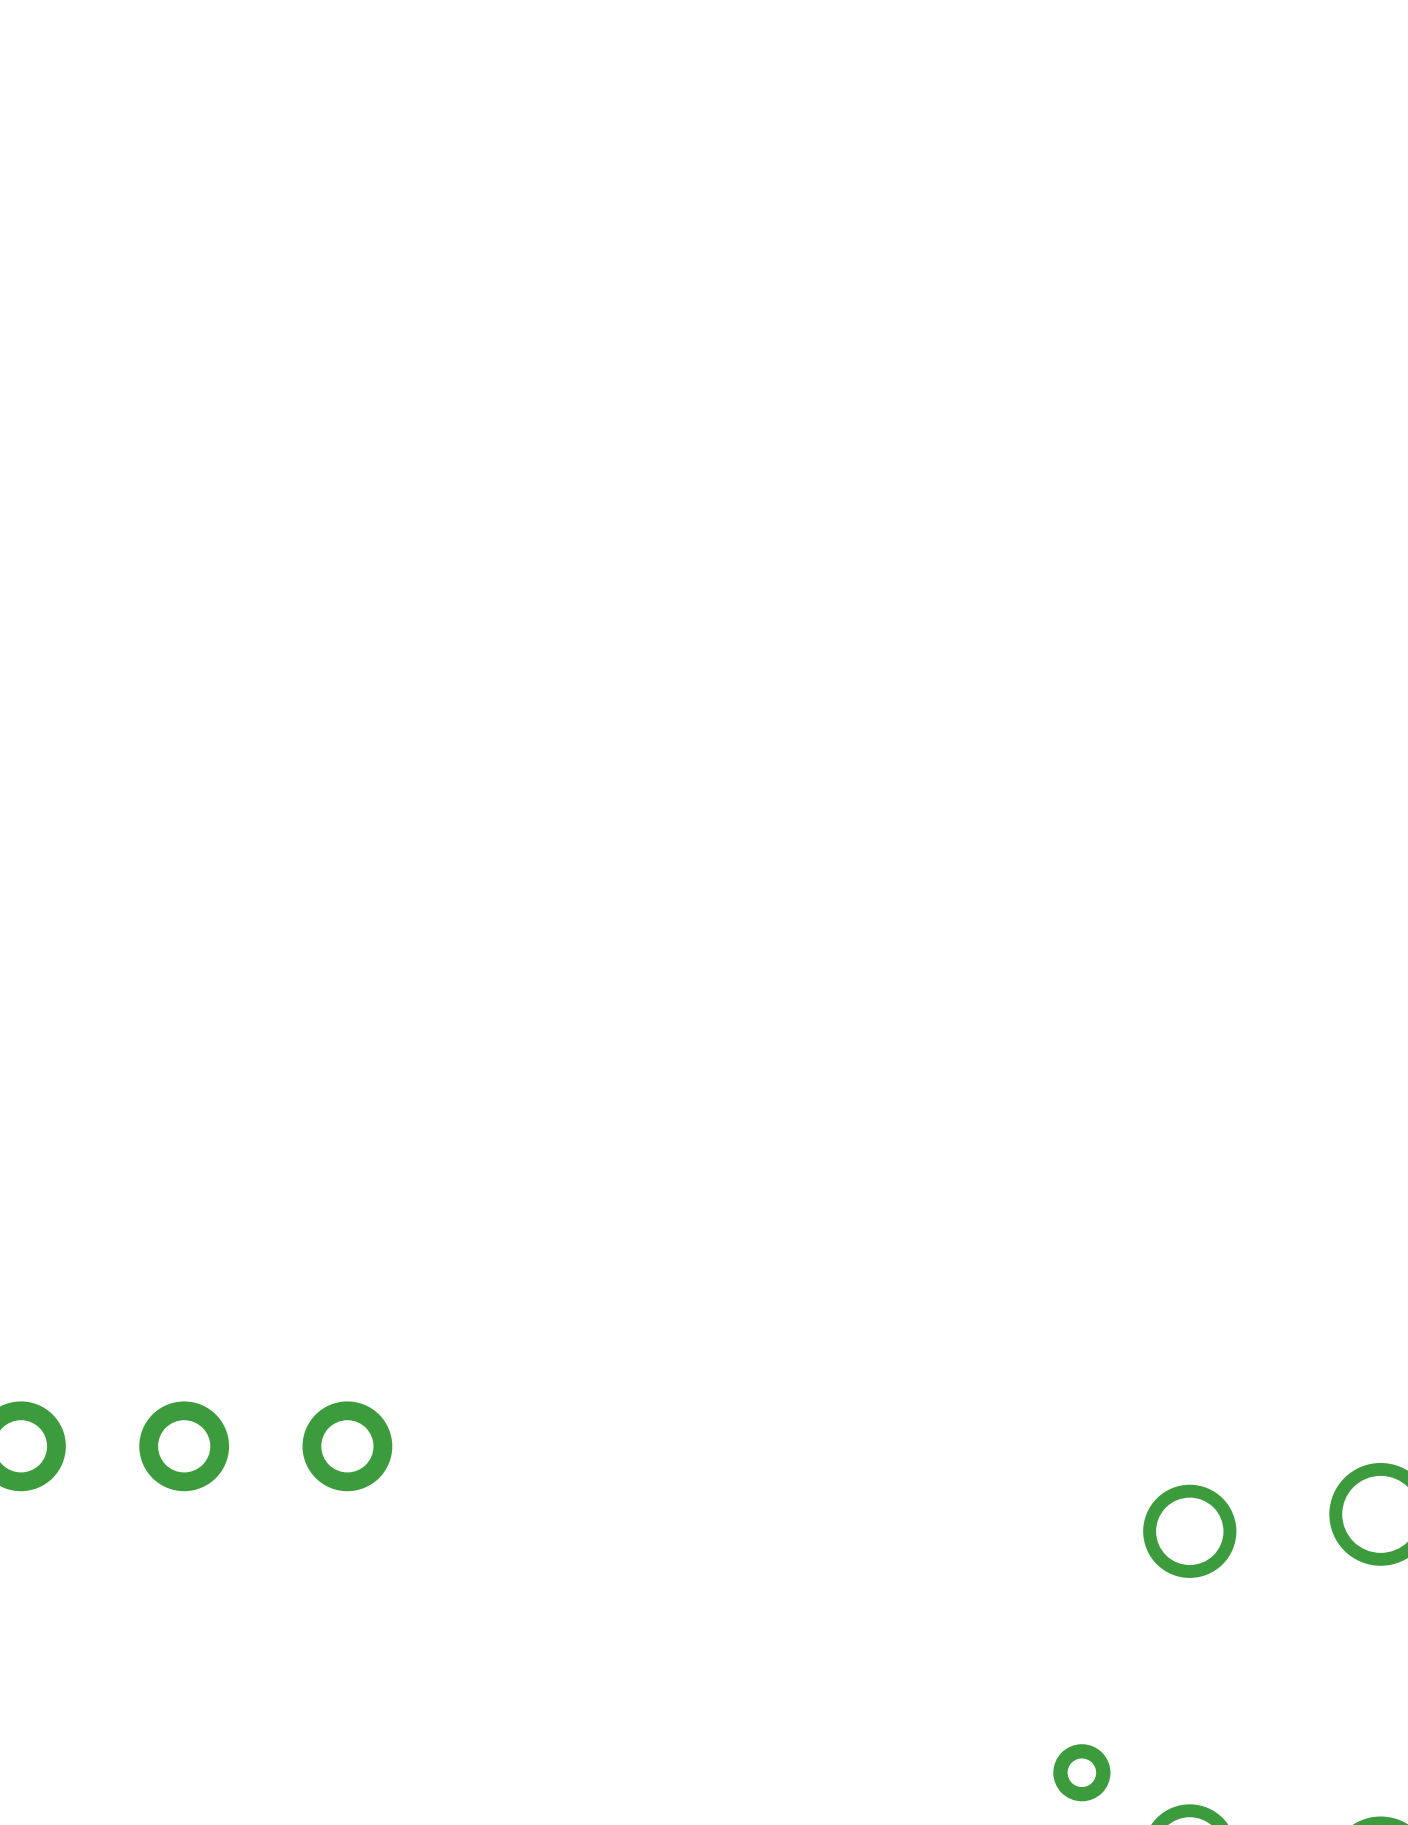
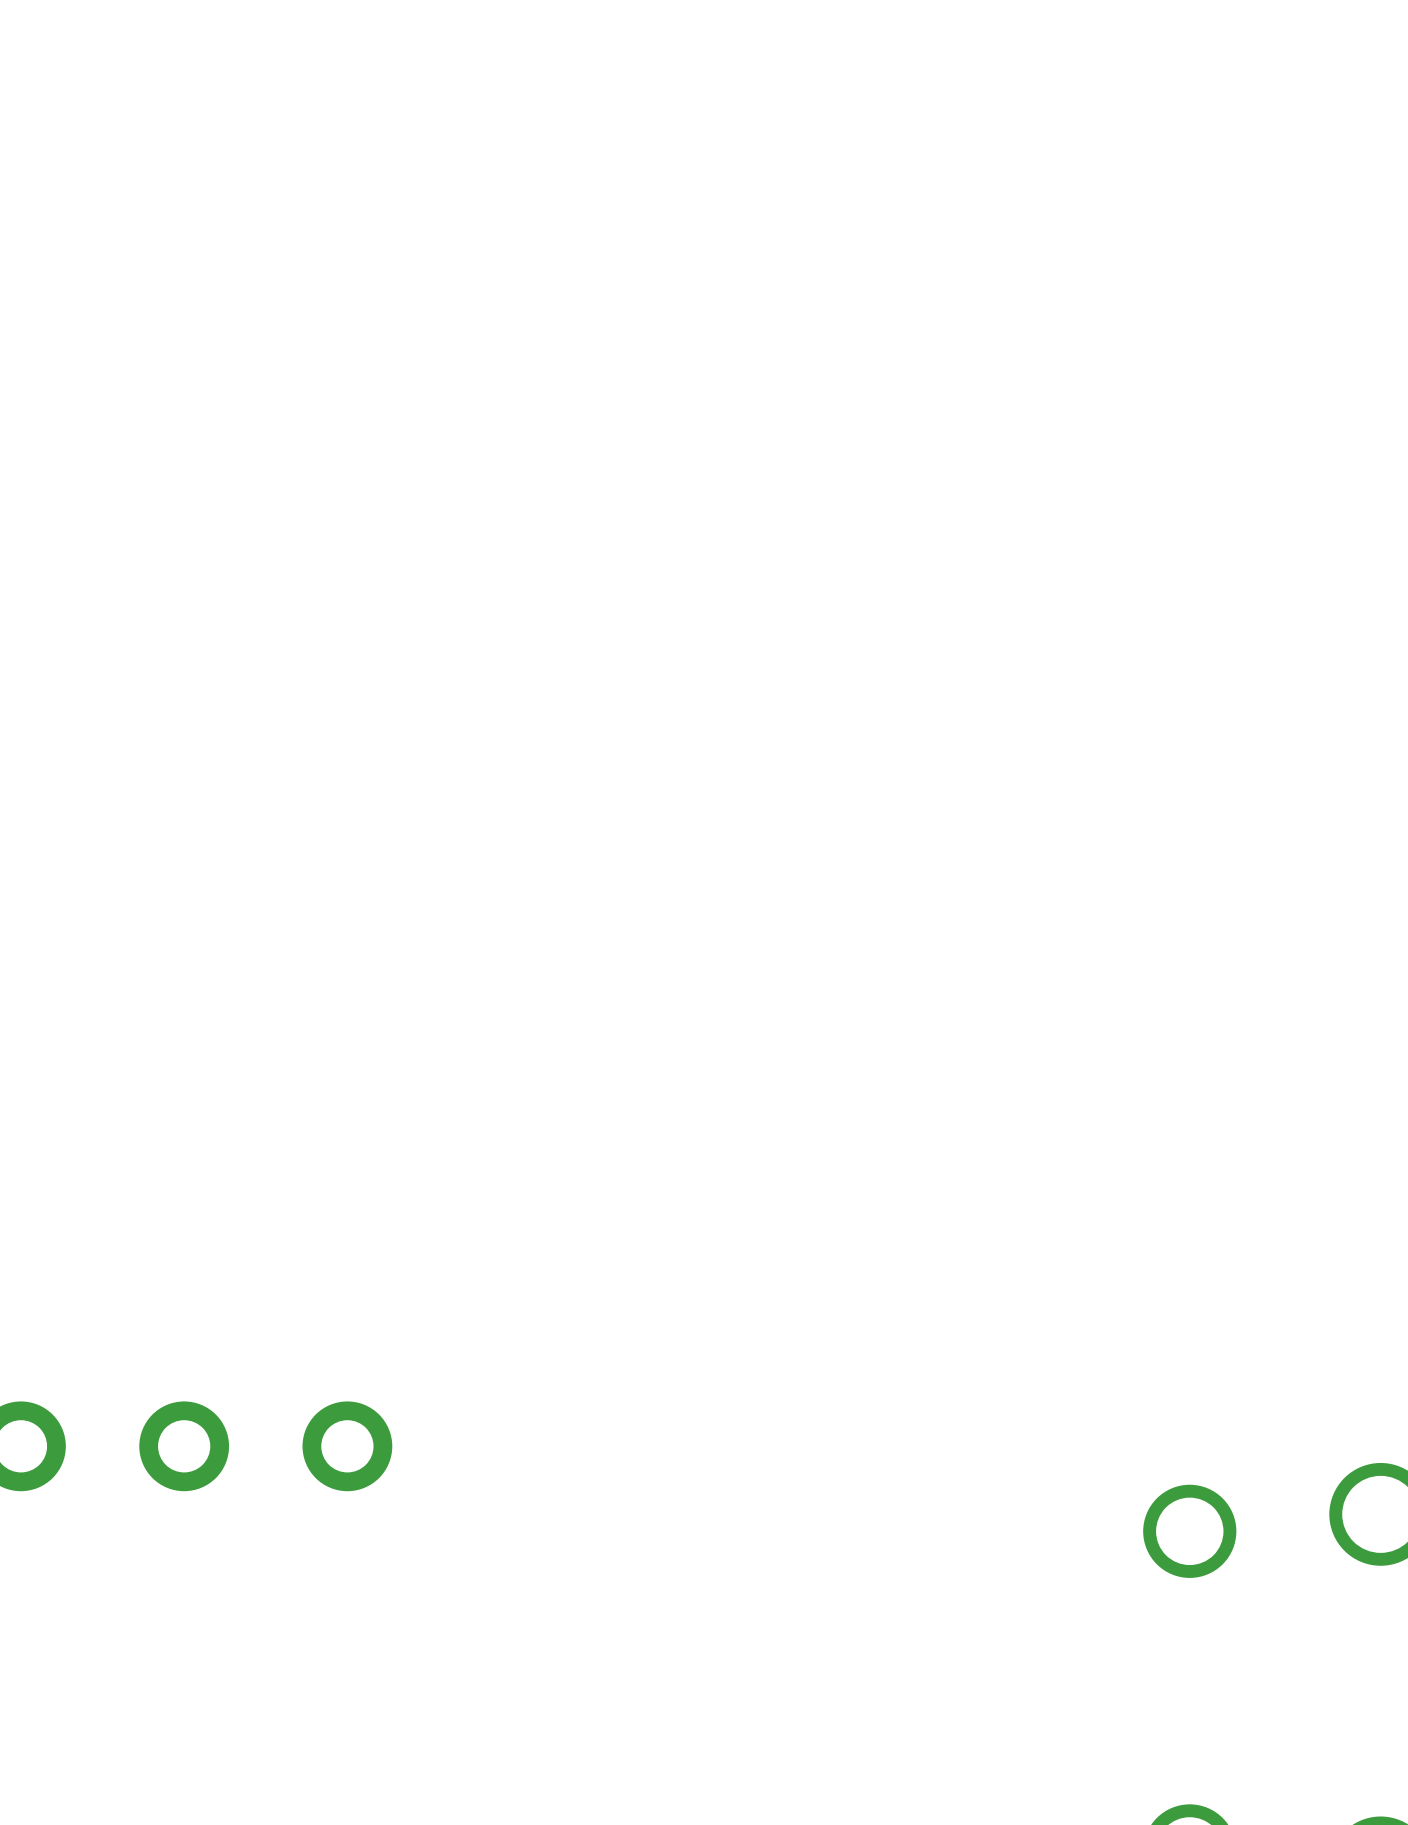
via: (1081, 1772) -> none

